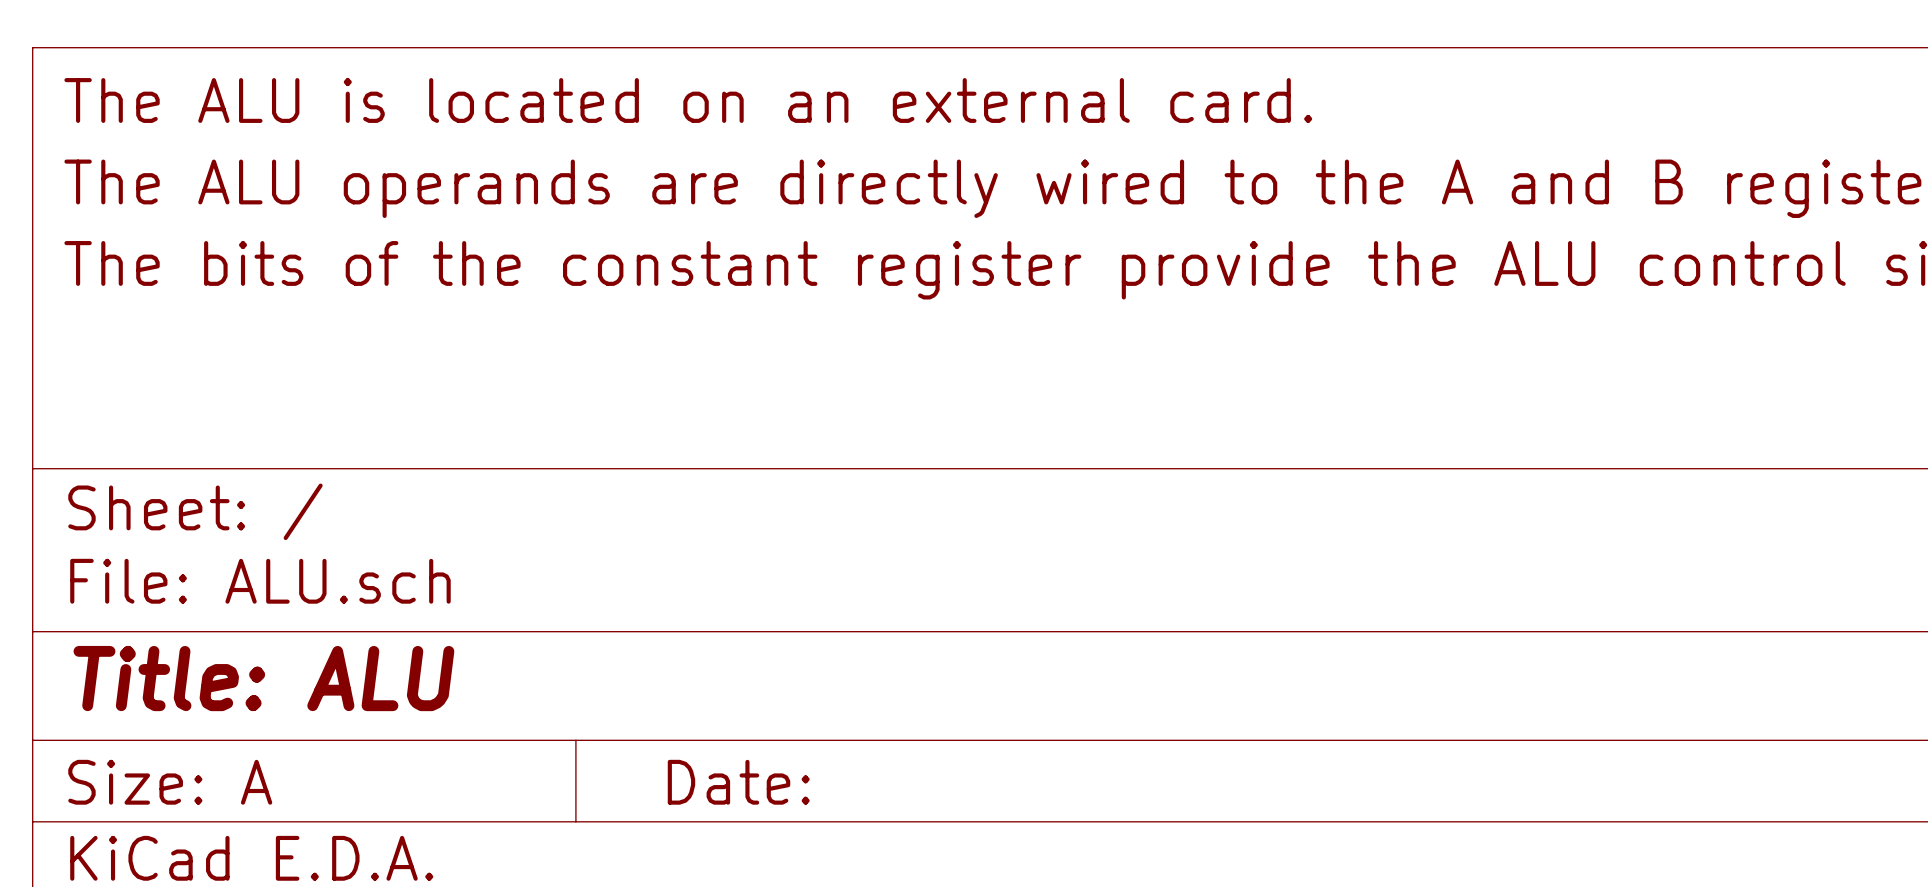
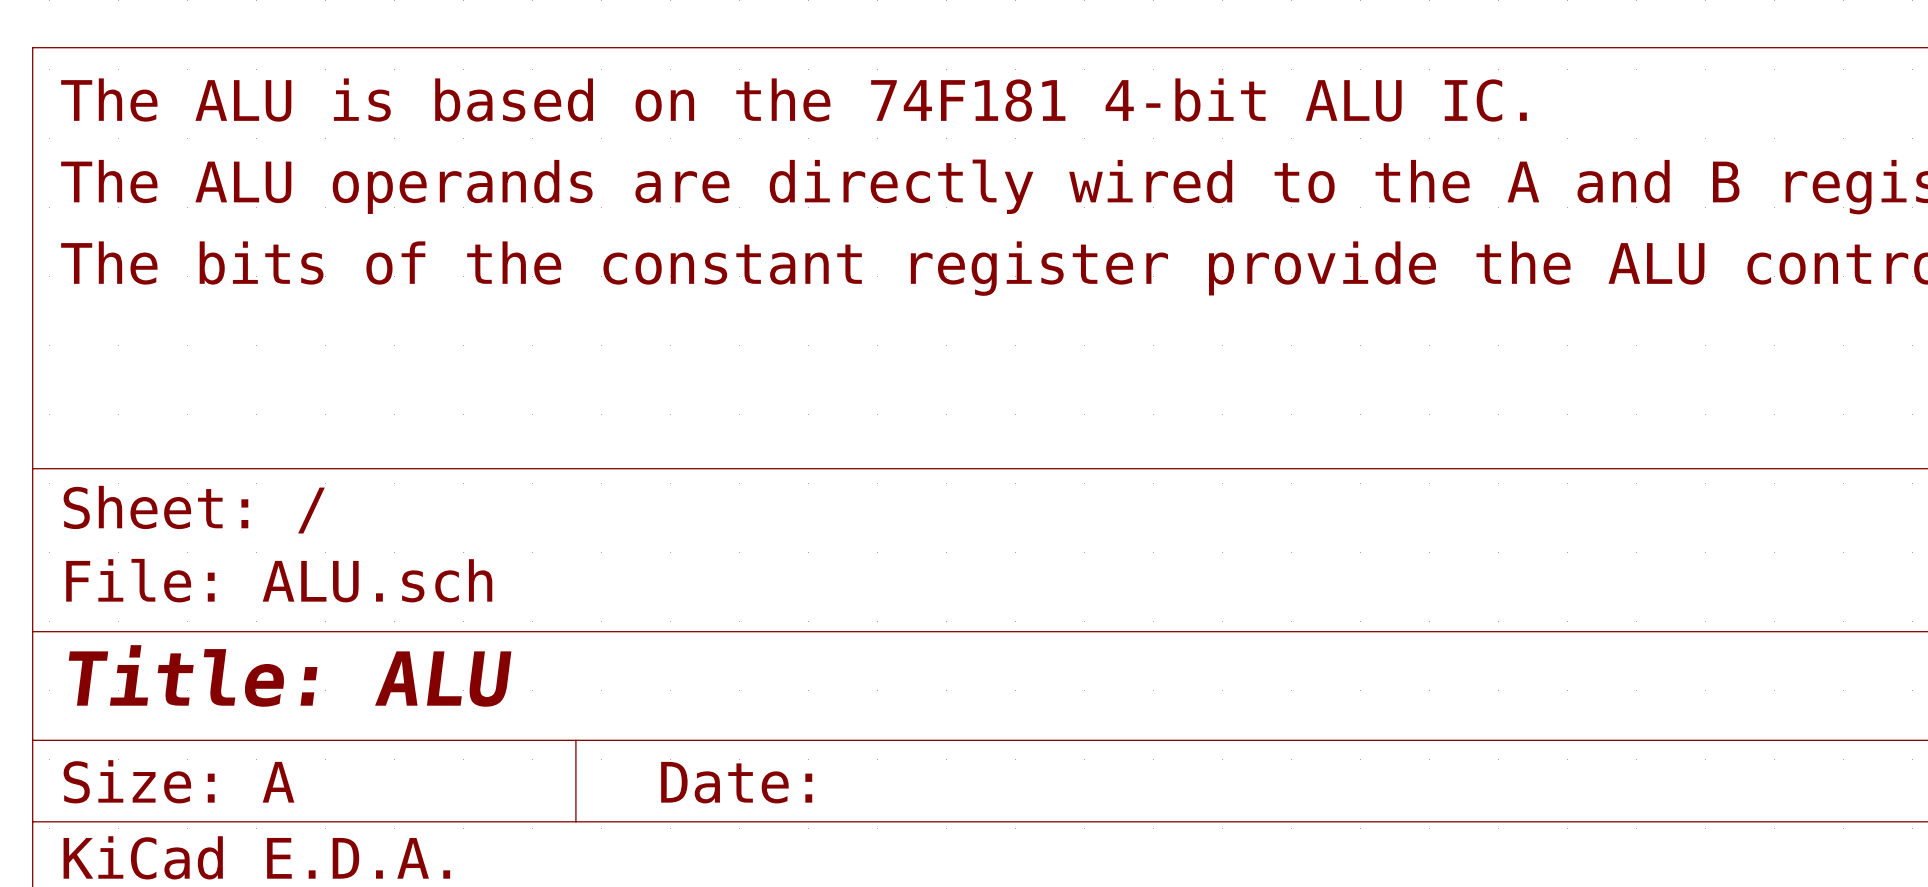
title block: The ALU is located on an external card. (688, 100) -> The ALU is based on the 74F181 4-bit ALU IC. (793, 100)

